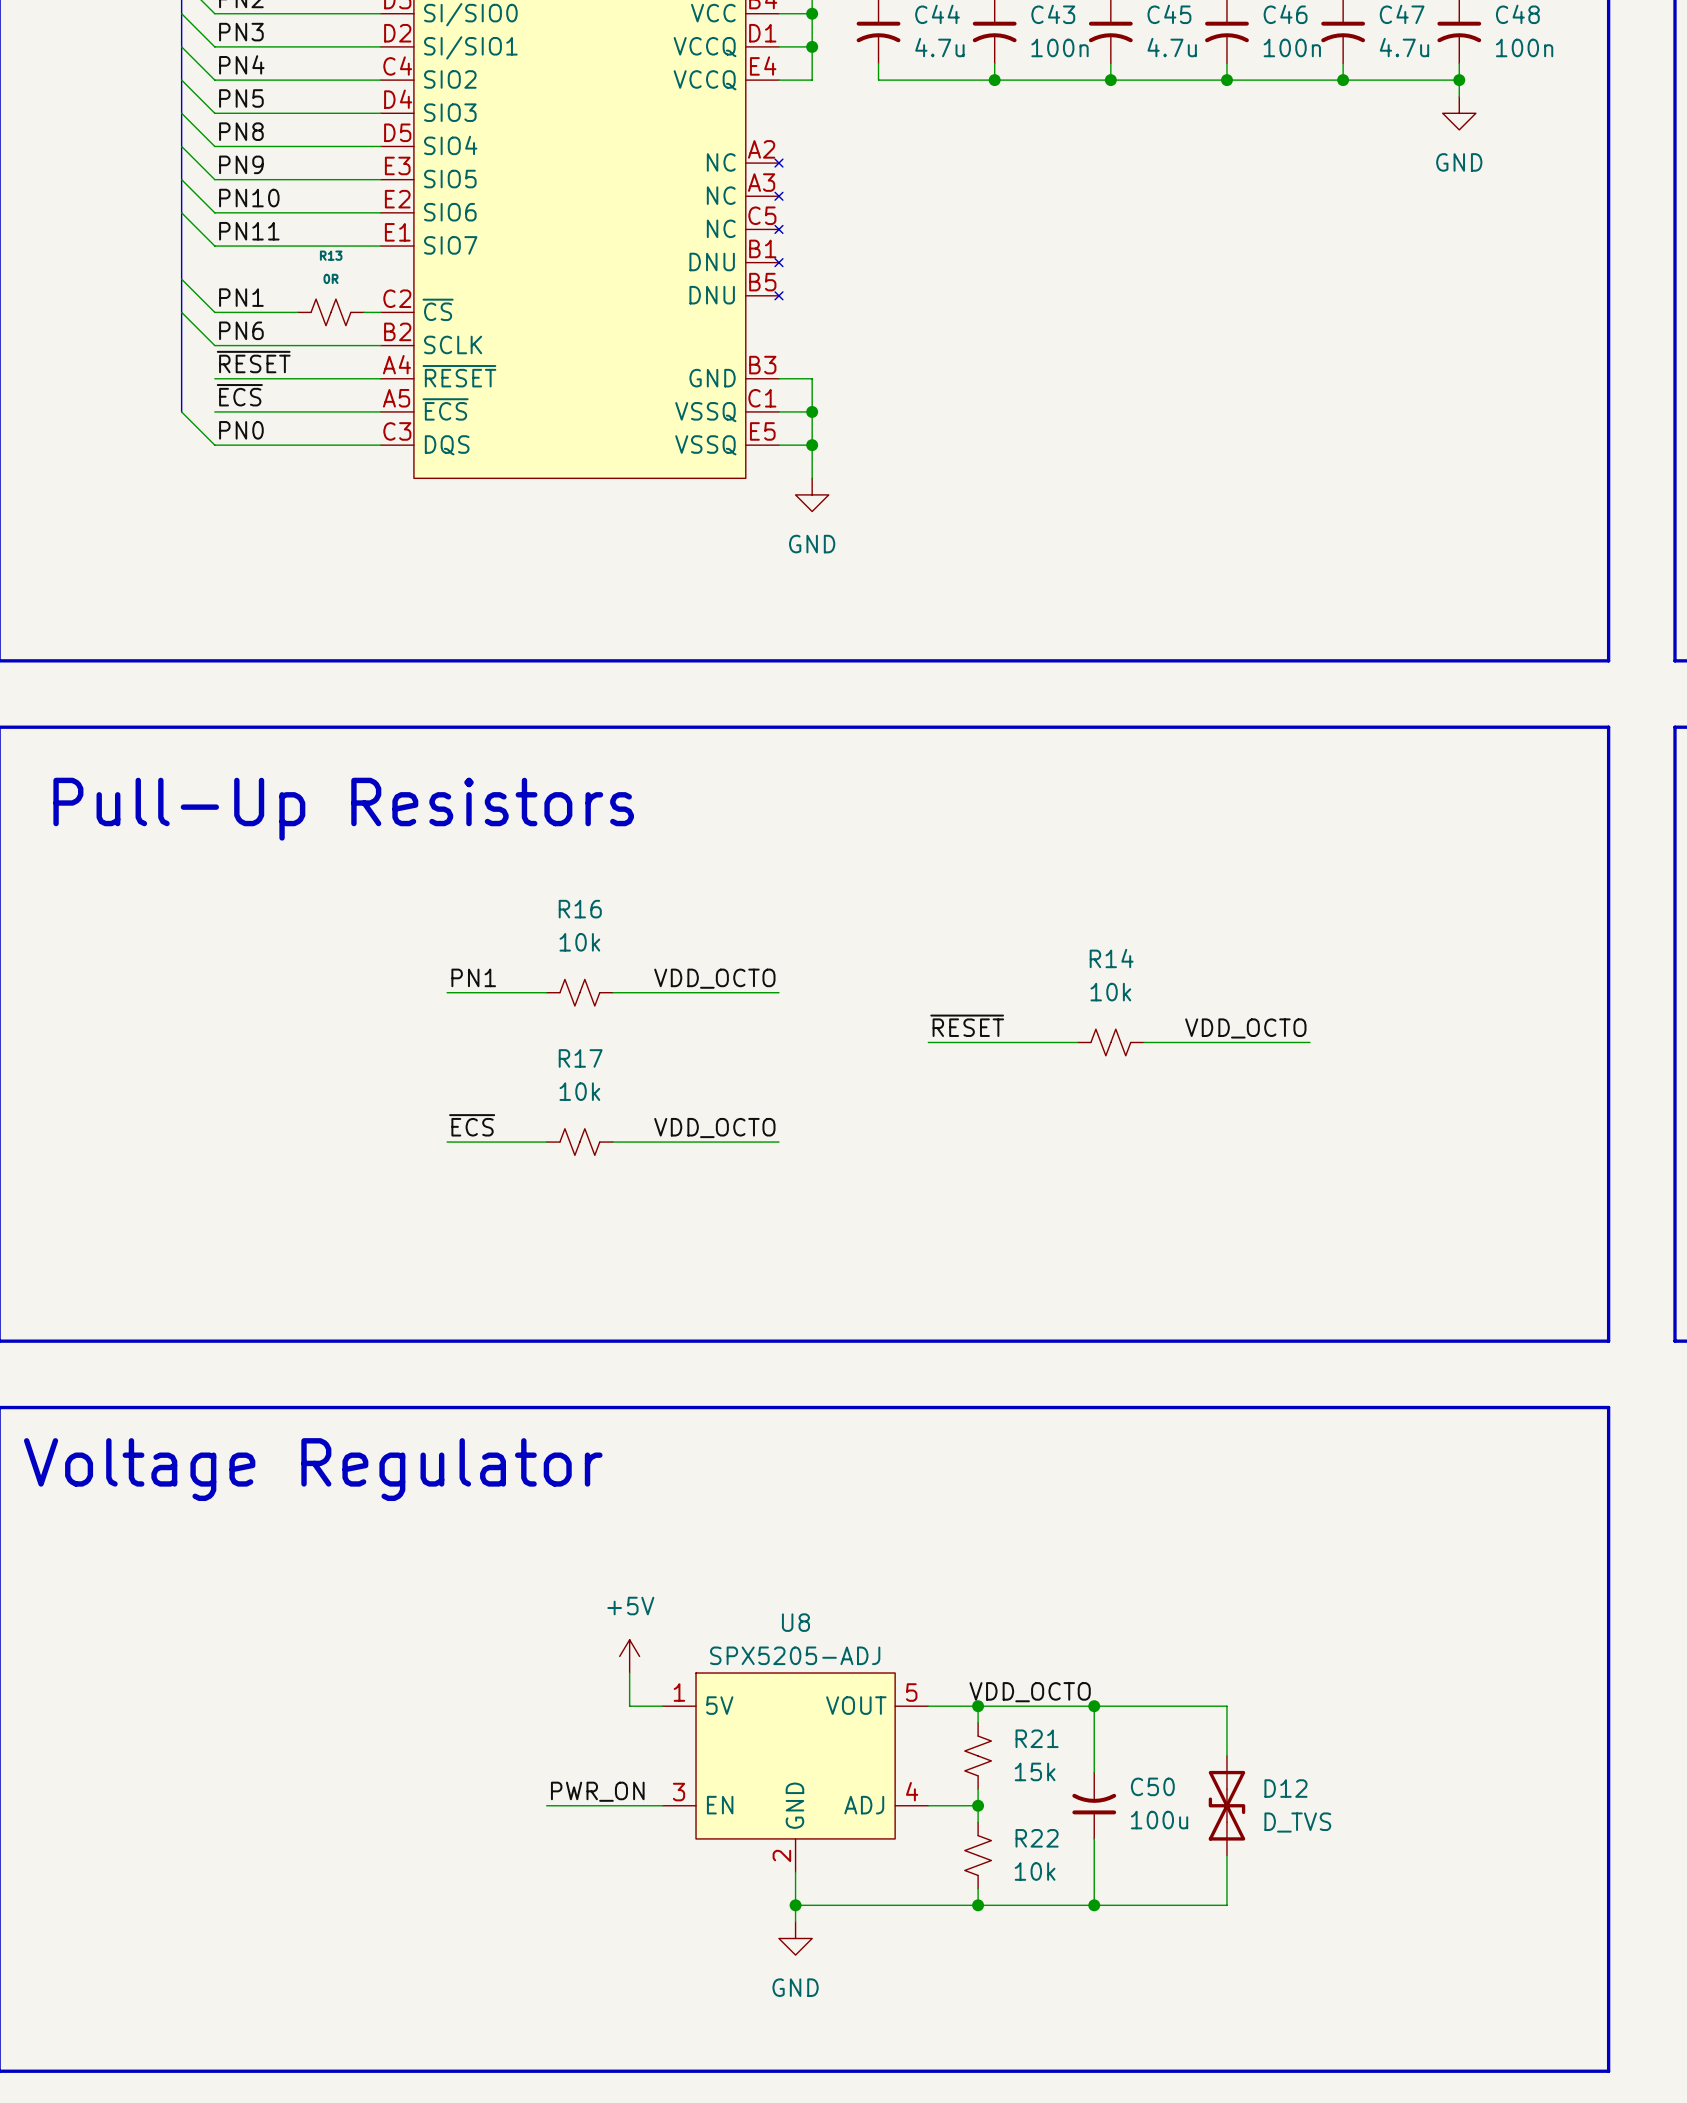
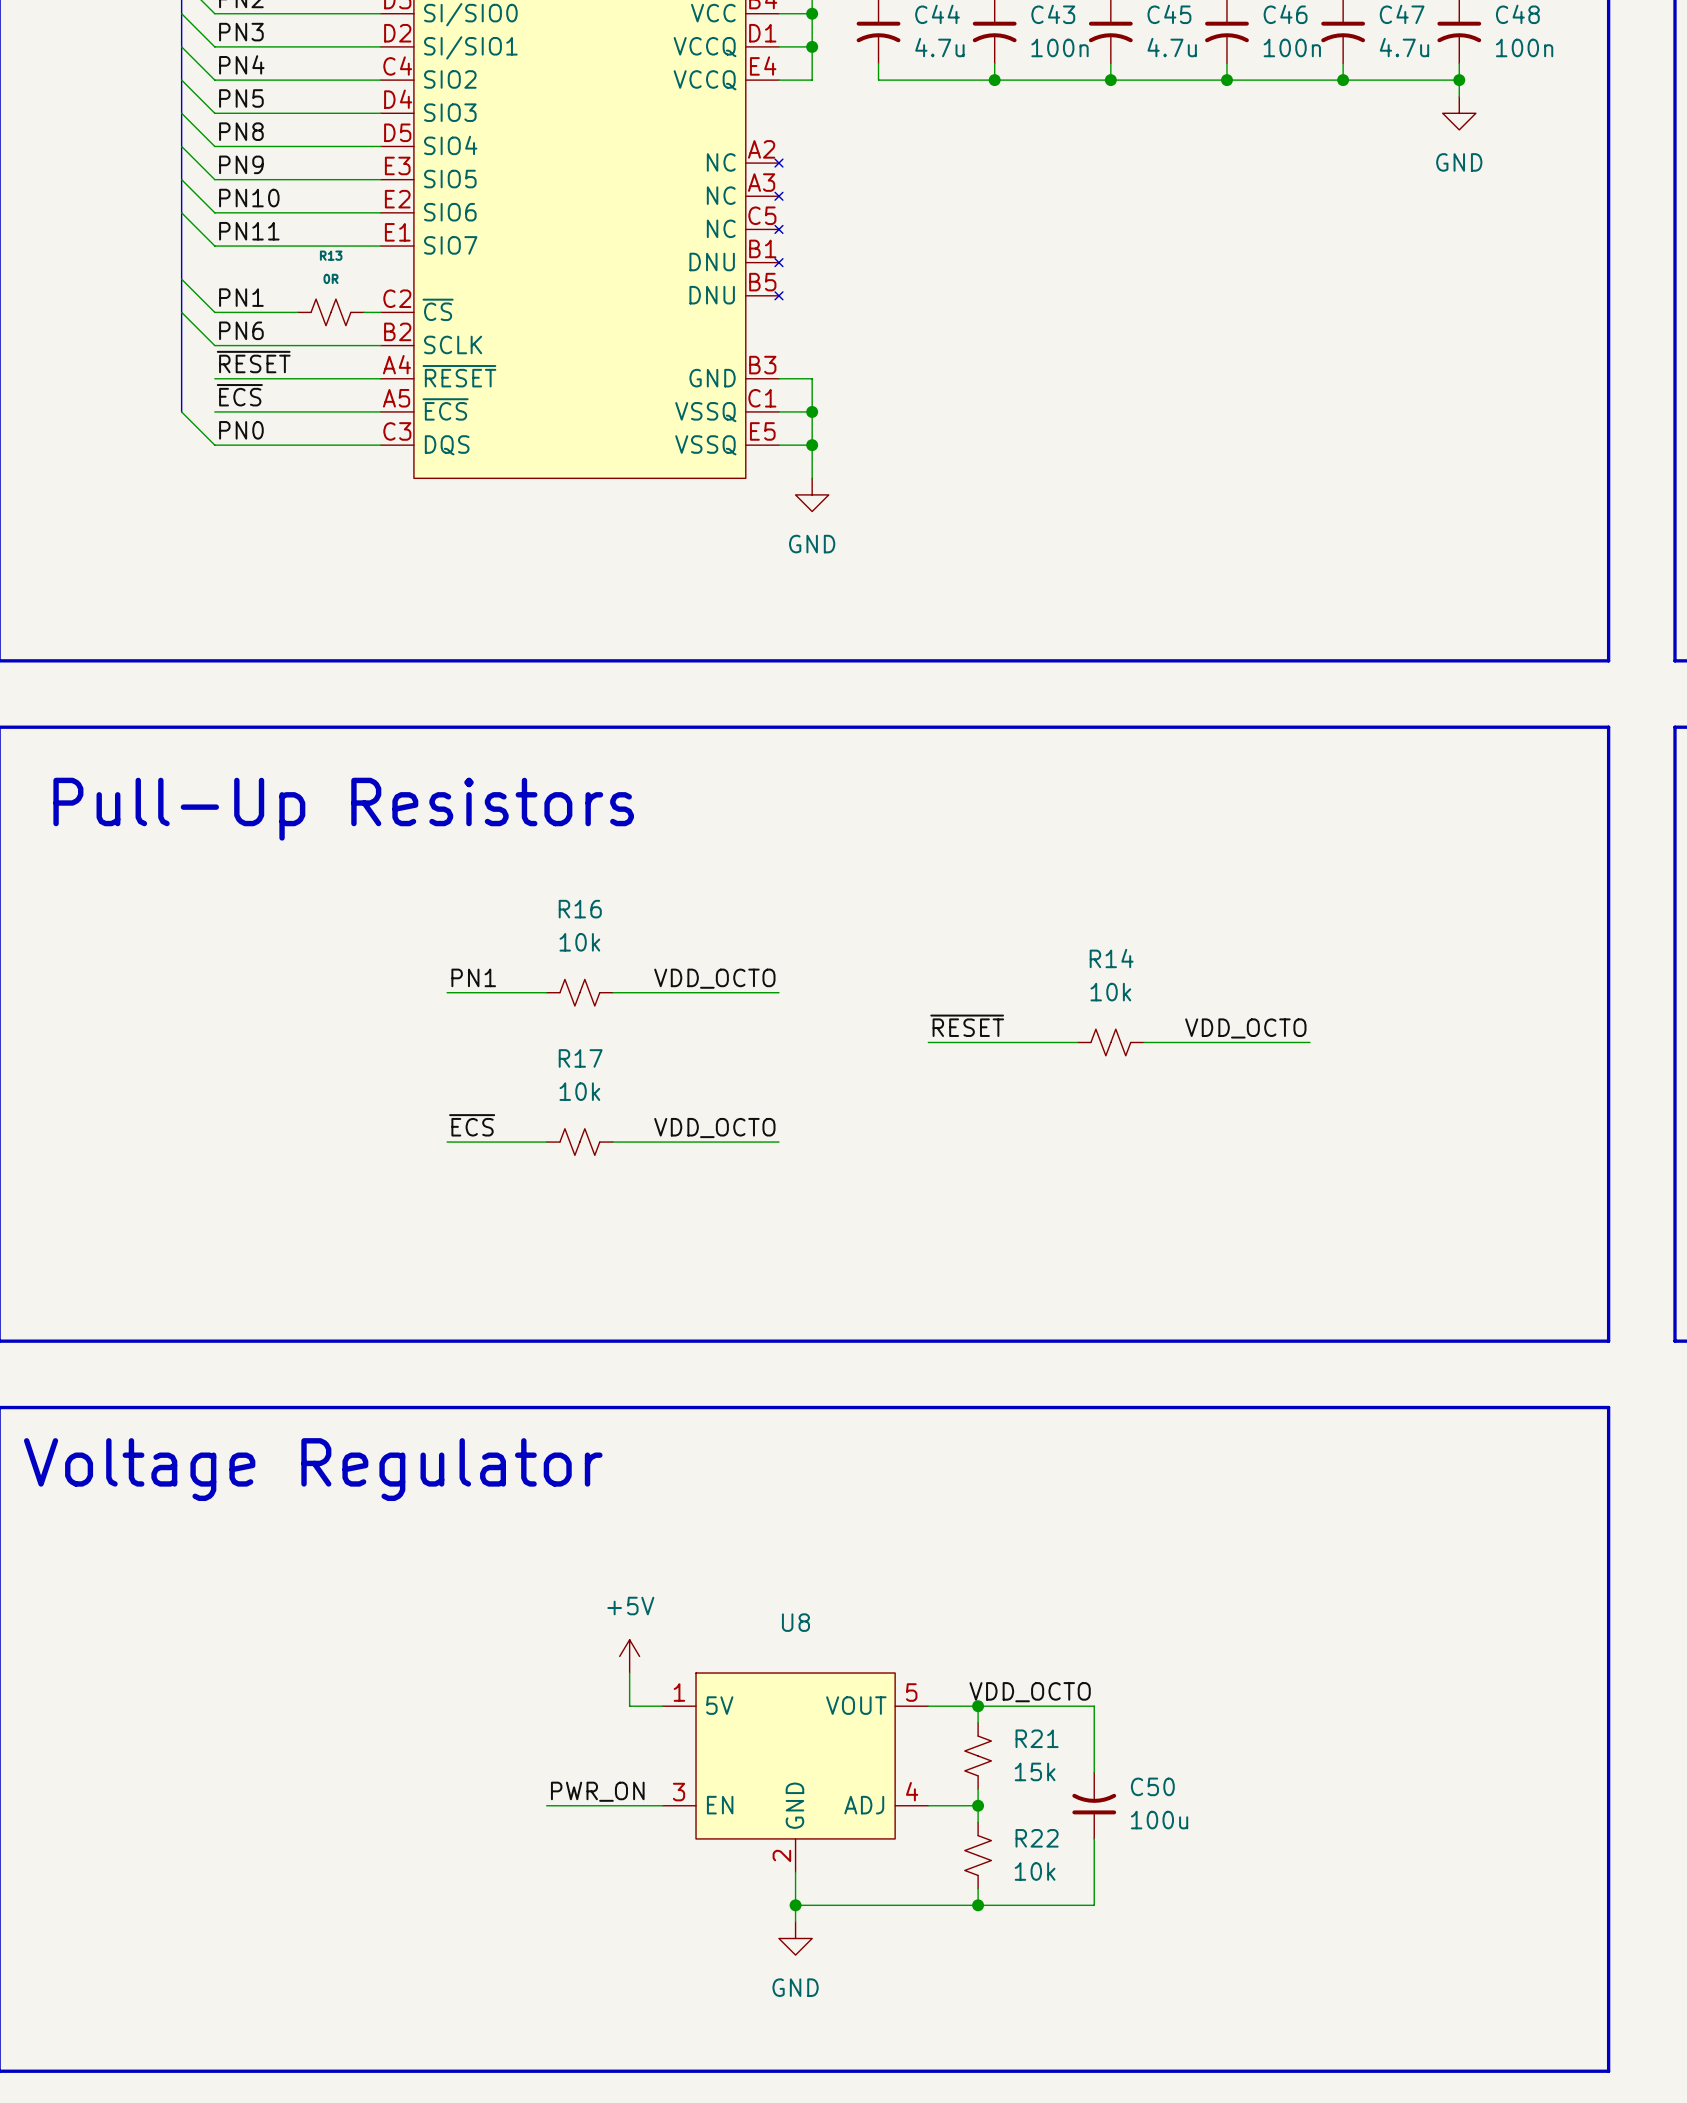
U8 value: SPX5205-ADJ (795, 1655) -> none
wire: (1094, 1706) (1226, 1706) (1226, 1755) -> none
junction: (1094, 1706) -> none
D12: D_TVS (1226, 1805) -> none
wire: (1226, 1855) (1226, 1905) (1094, 1905) -> none
junction: (1094, 1905) -> none

